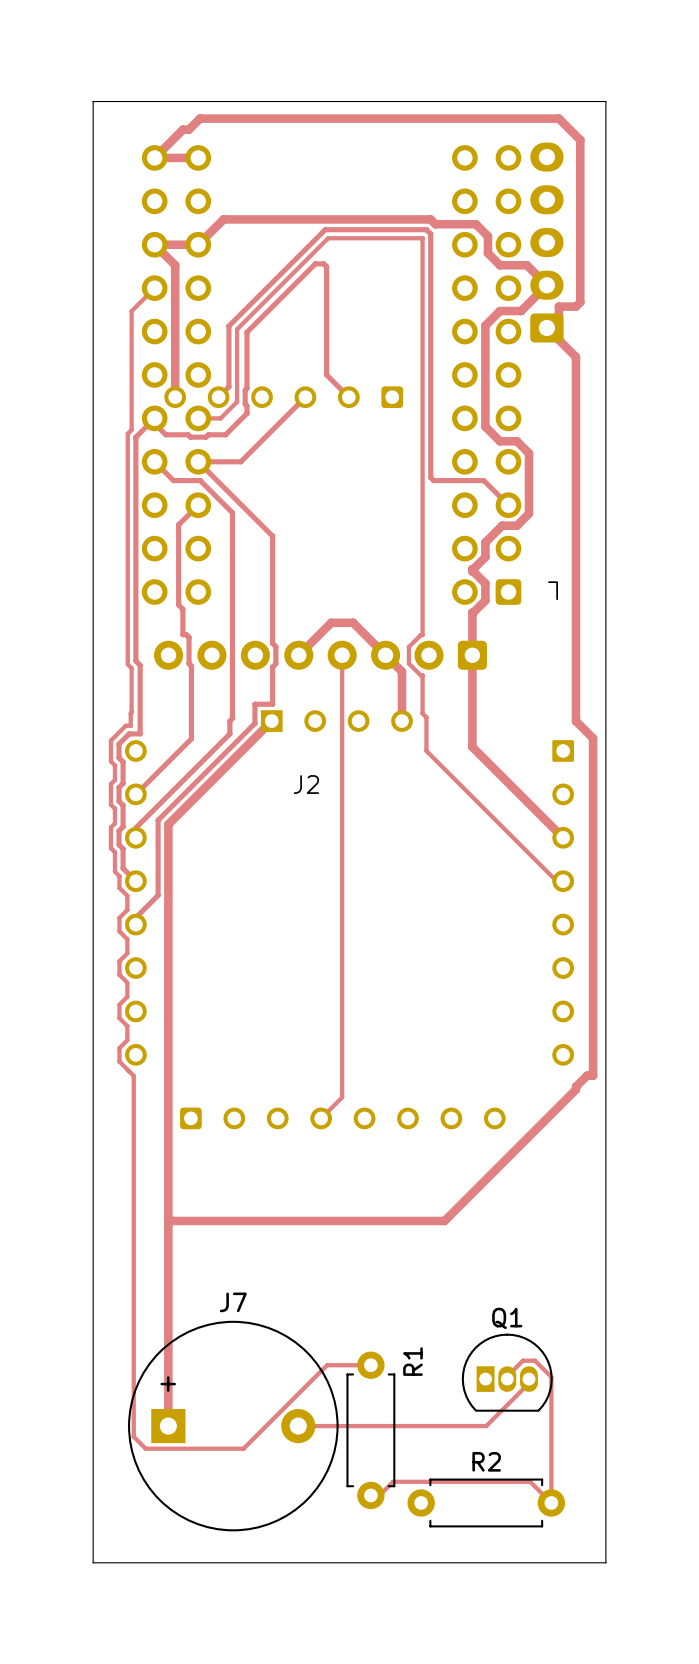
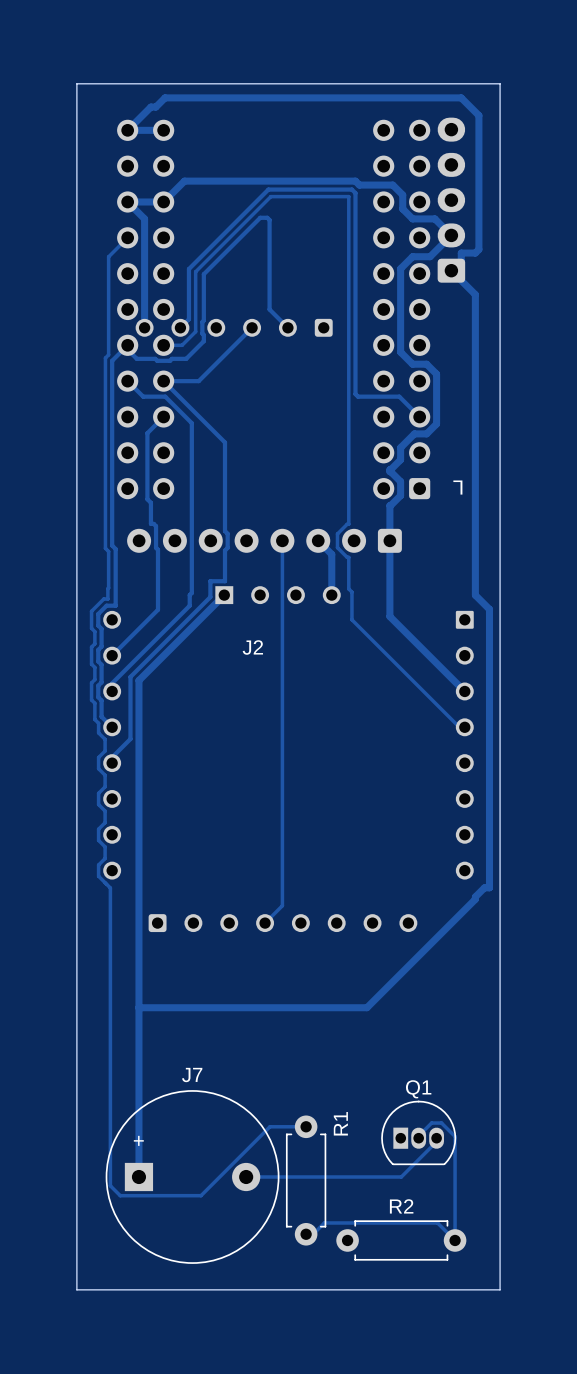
track: (298, 655) (331, 622) (353, 622) (385, 655) -> none

